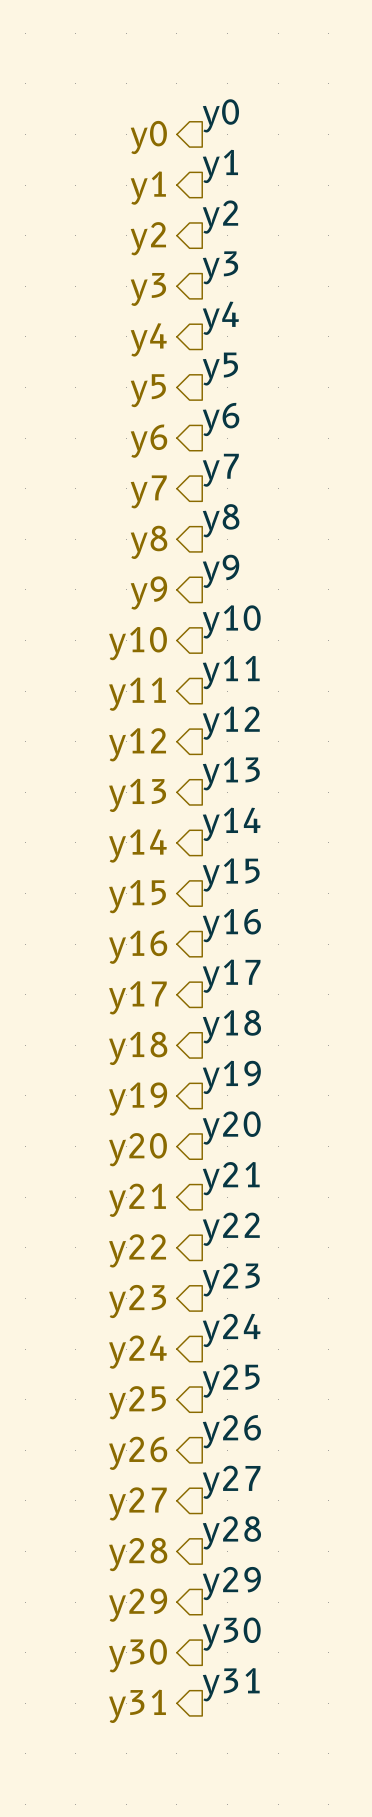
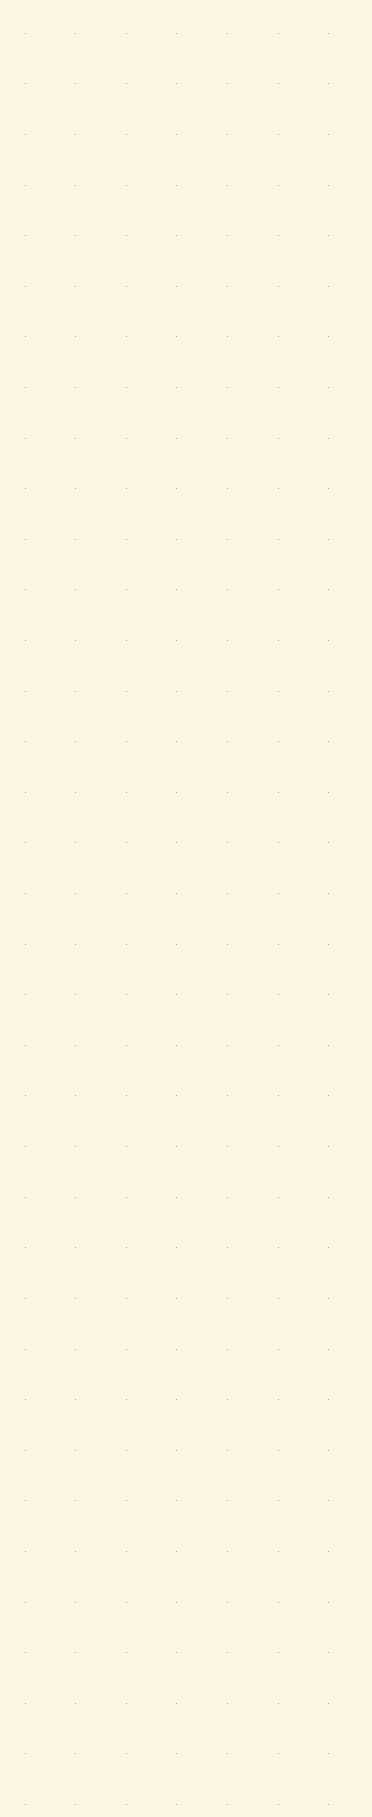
label: y0 (220, 115) -> none
hierarchical label: y0 (148, 137) -> none
label: y1 (220, 166) -> none
hierarchical label: y1 (148, 188) -> none
label: y2 (220, 217) -> none
hierarchical label: y2 (148, 238) -> none
label: y3 (220, 267) -> none
hierarchical label: y3 (148, 289) -> none
label: y4 (220, 318) -> none
hierarchical label: y4 (148, 339) -> none
label: y5 (220, 369) -> none
hierarchical label: y5 (148, 390) -> none
label: y6 (221, 419) -> none
hierarchical label: y6 (148, 441) -> none
label: y7 (220, 470) -> none
hierarchical label: y7 (148, 491) -> none
label: y8 (221, 520) -> none
hierarchical label: y8 (149, 542) -> none
label: y9 (221, 571) -> none
hierarchical label: y9 (148, 592) -> none
label: y10 (231, 621) -> none
hierarchical label: y10 (138, 643) -> none
label: y11 (231, 672) -> none
hierarchical label: y11 (137, 694) -> none
label: y12 (231, 723) -> none
hierarchical label: y12 (137, 744) -> none
label: y13 (231, 773) -> none
hierarchical label: y13 (137, 795) -> none
label: y14 (231, 824) -> none
hierarchical label: y14 (137, 846) -> none
label: y15 (231, 874) -> none
hierarchical label: y15 (137, 896) -> none
label: y16 (231, 925) -> none
hierarchical label: y16 (138, 947) -> none
label: y17 (231, 976) -> none
hierarchical label: y17 (137, 997) -> none
label: y18 (231, 1026) -> none
hierarchical label: y18 (138, 1048) -> none
label: y19 (231, 1077) -> none
hierarchical label: y19 (138, 1099) -> none
label: y20 (231, 1128) -> none
hierarchical label: y20 (138, 1149) -> none
label: y21 (231, 1178) -> none
hierarchical label: y21 (137, 1200) -> none
label: y22 (231, 1229) -> none
hierarchical label: y22 (137, 1250) -> none
label: y23 (231, 1279) -> none
hierarchical label: y23 (137, 1301) -> none
label: y24 (231, 1330) -> none
hierarchical label: y24 (137, 1352) -> none
label: y25 (231, 1381) -> none
hierarchical label: y25 (137, 1402) -> none
label: y26 (231, 1431) -> none
hierarchical label: y26 (138, 1453) -> none
label: y27 (231, 1482) -> none
hierarchical label: y27 (137, 1503) -> none
label: y28 (231, 1532) -> none
hierarchical label: y28 (138, 1554) -> none
label: y29 (231, 1583) -> none
hierarchical label: y29 (138, 1605) -> none
label: y30 (231, 1634) -> none
hierarchical label: y30 (138, 1655) -> none
label: y31 (231, 1684) -> none
hierarchical label: y31 (137, 1706) -> none

